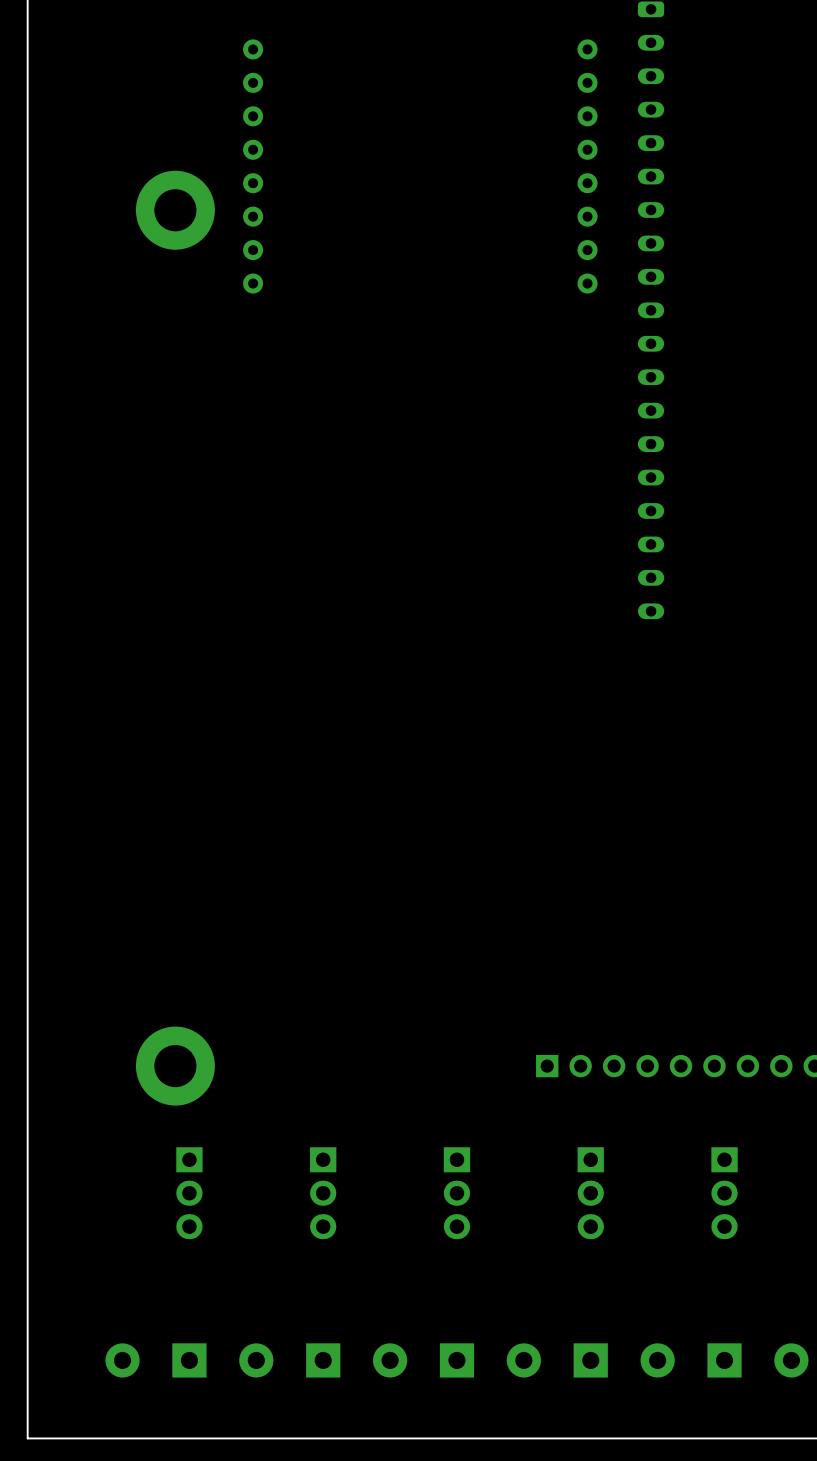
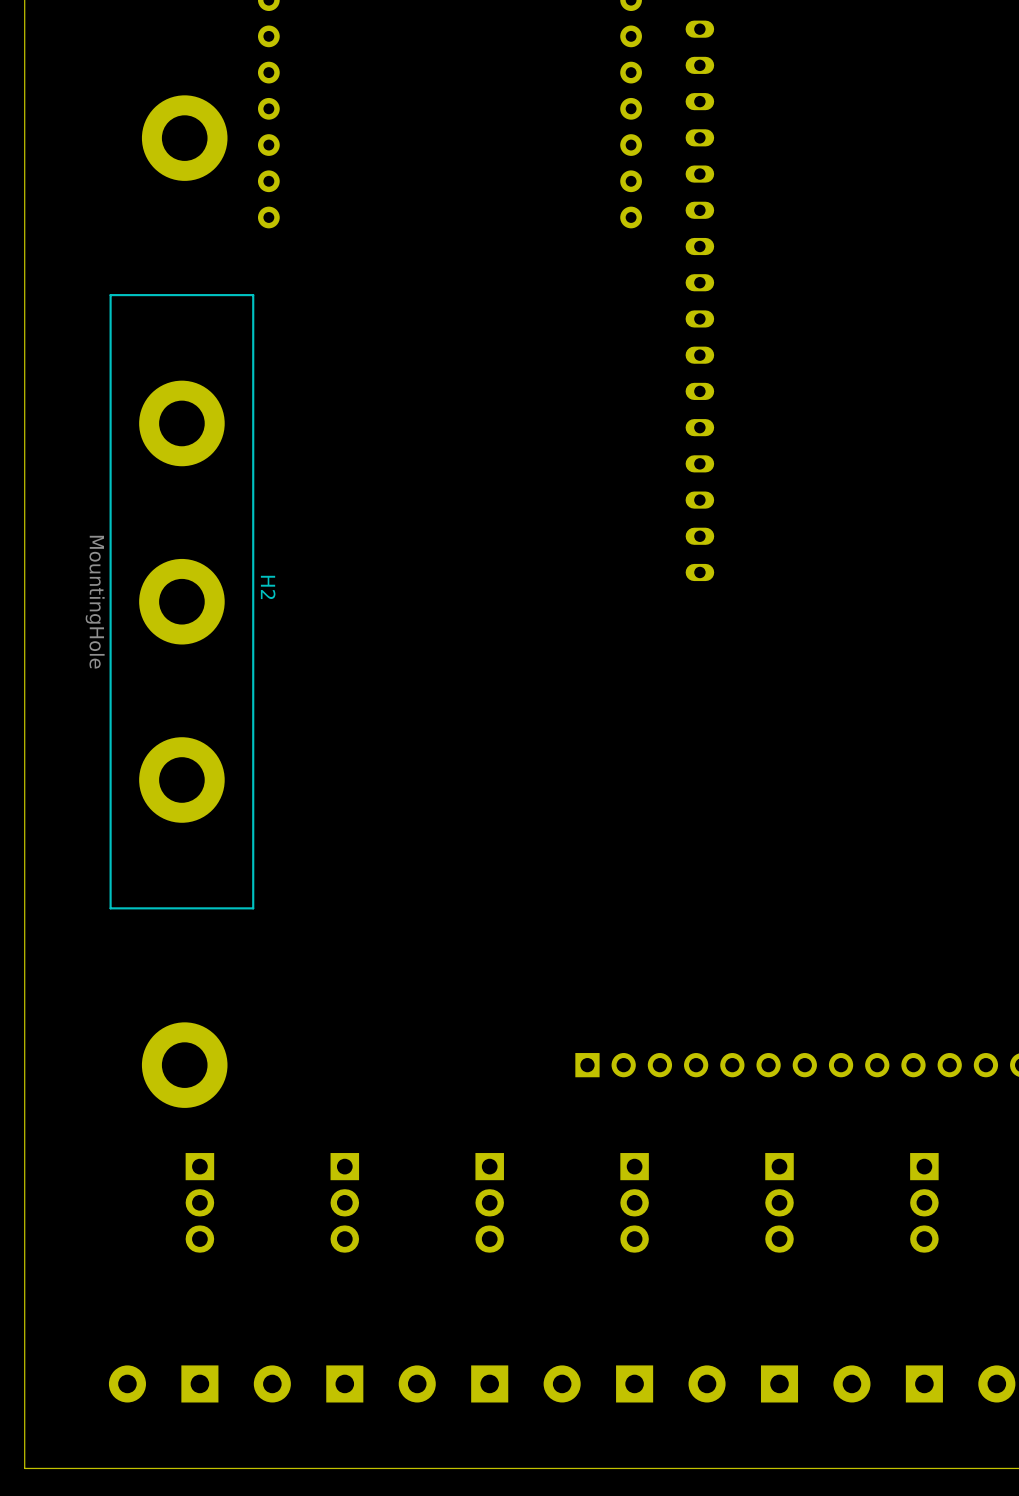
H2: none -> MountingHole (181, 601)

